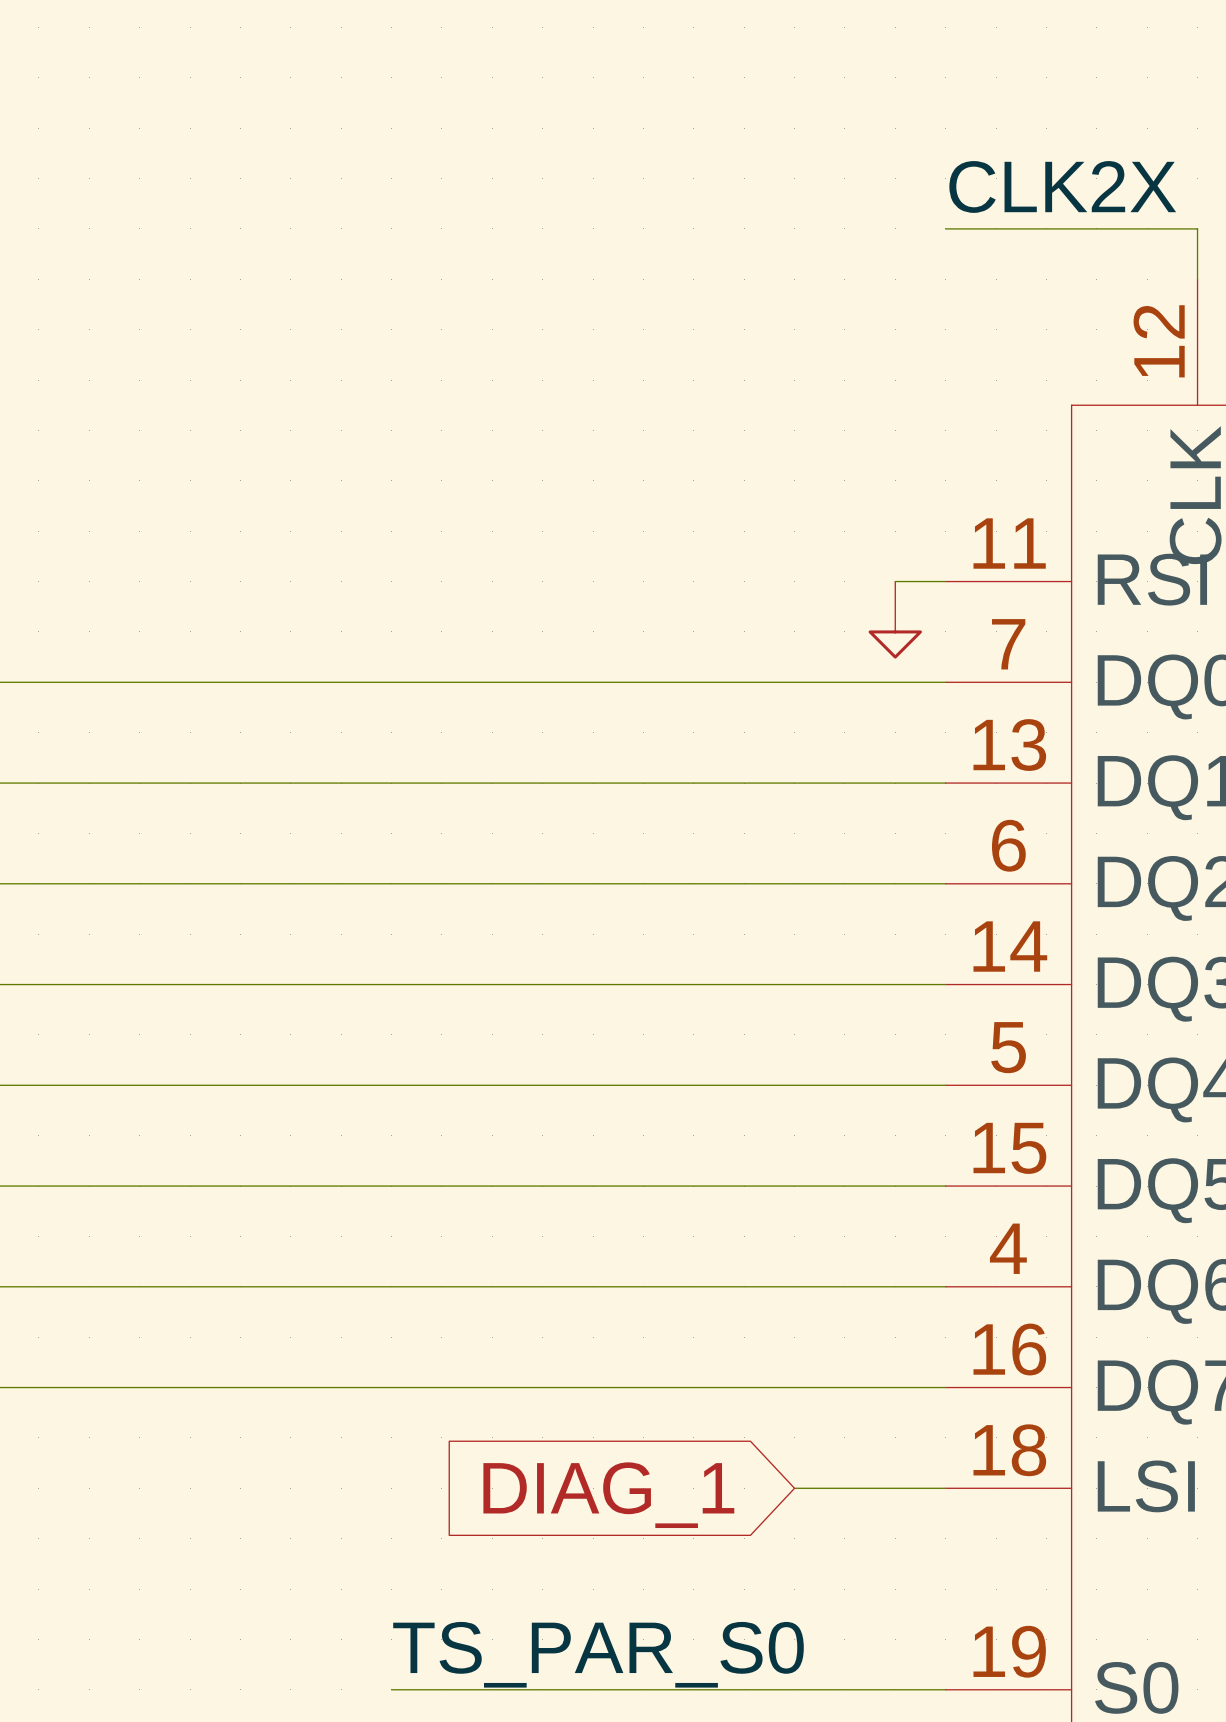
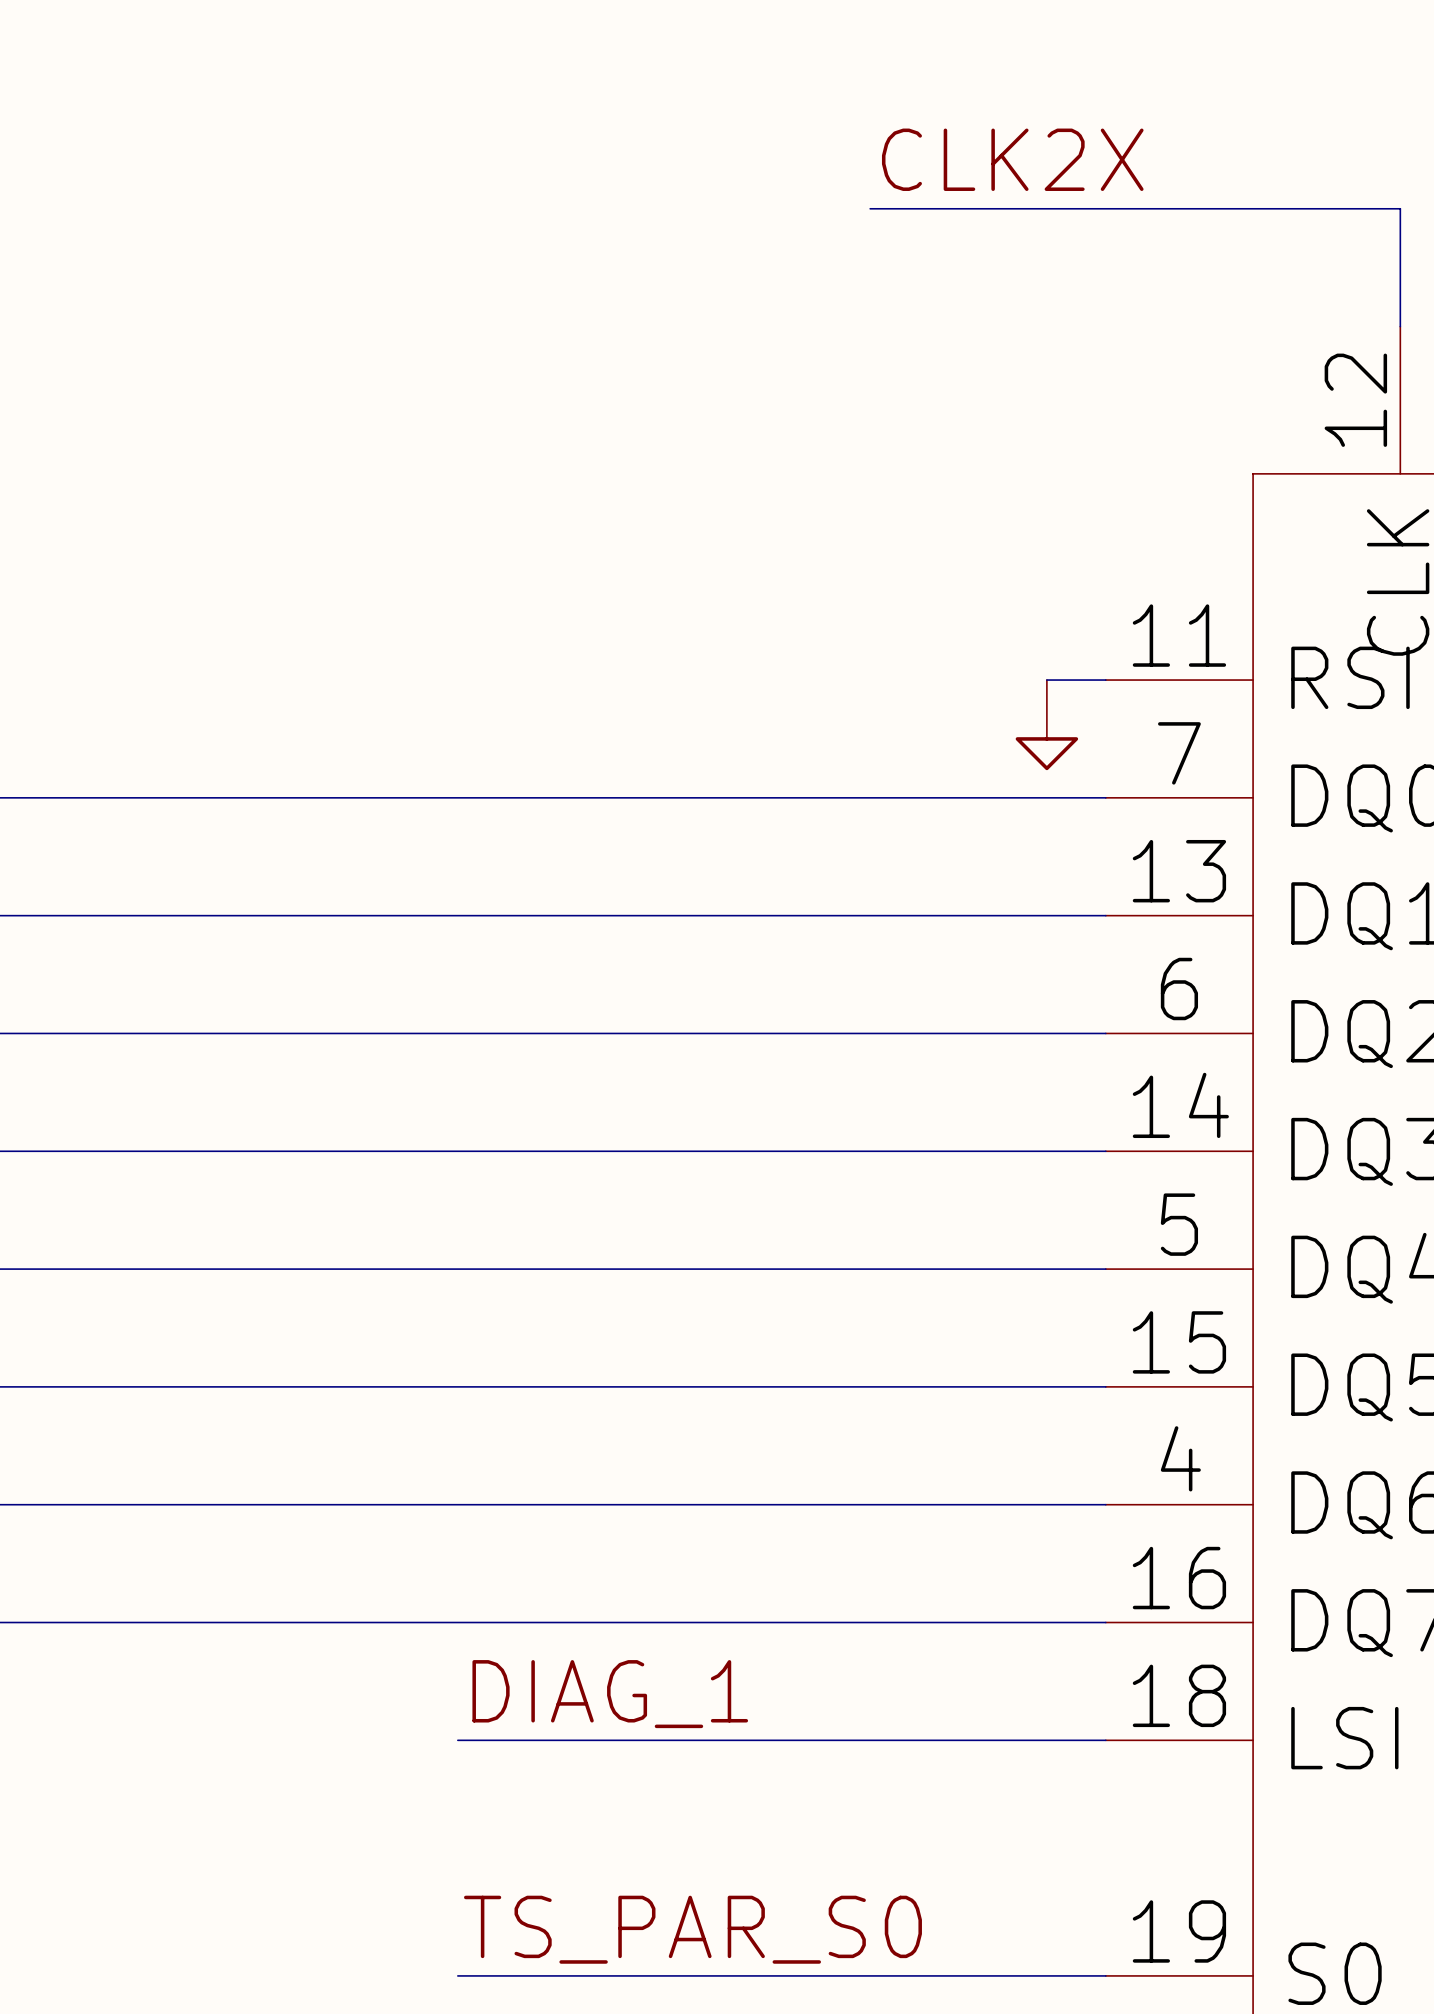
label position: CLK2X (1062, 186) -> CLK2X (1012, 159)
wire: (945, 228) (1197, 228) -> (870, 208) (1400, 208) (1400, 267)
label: none -> DIAG_1 (610, 1694)
wire: none -> (457, 1740) (929, 1740)
global label: DIAG_1 (608, 1495) -> none

